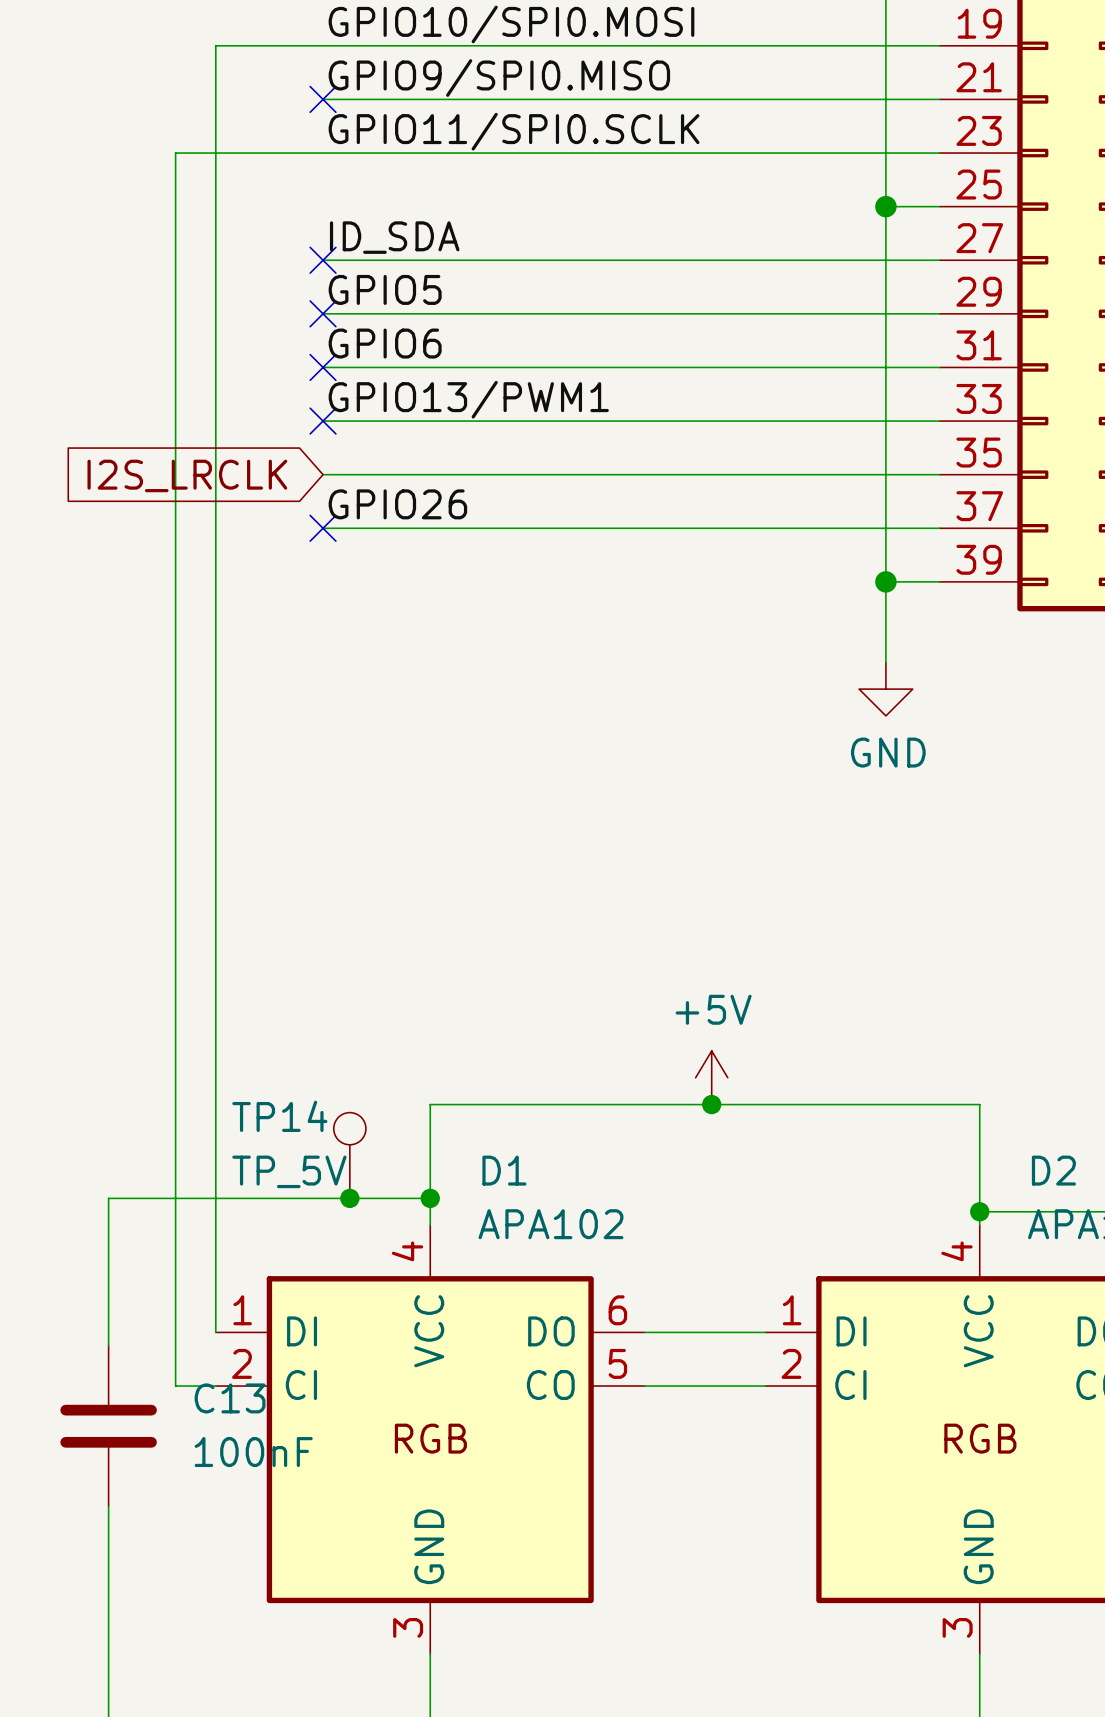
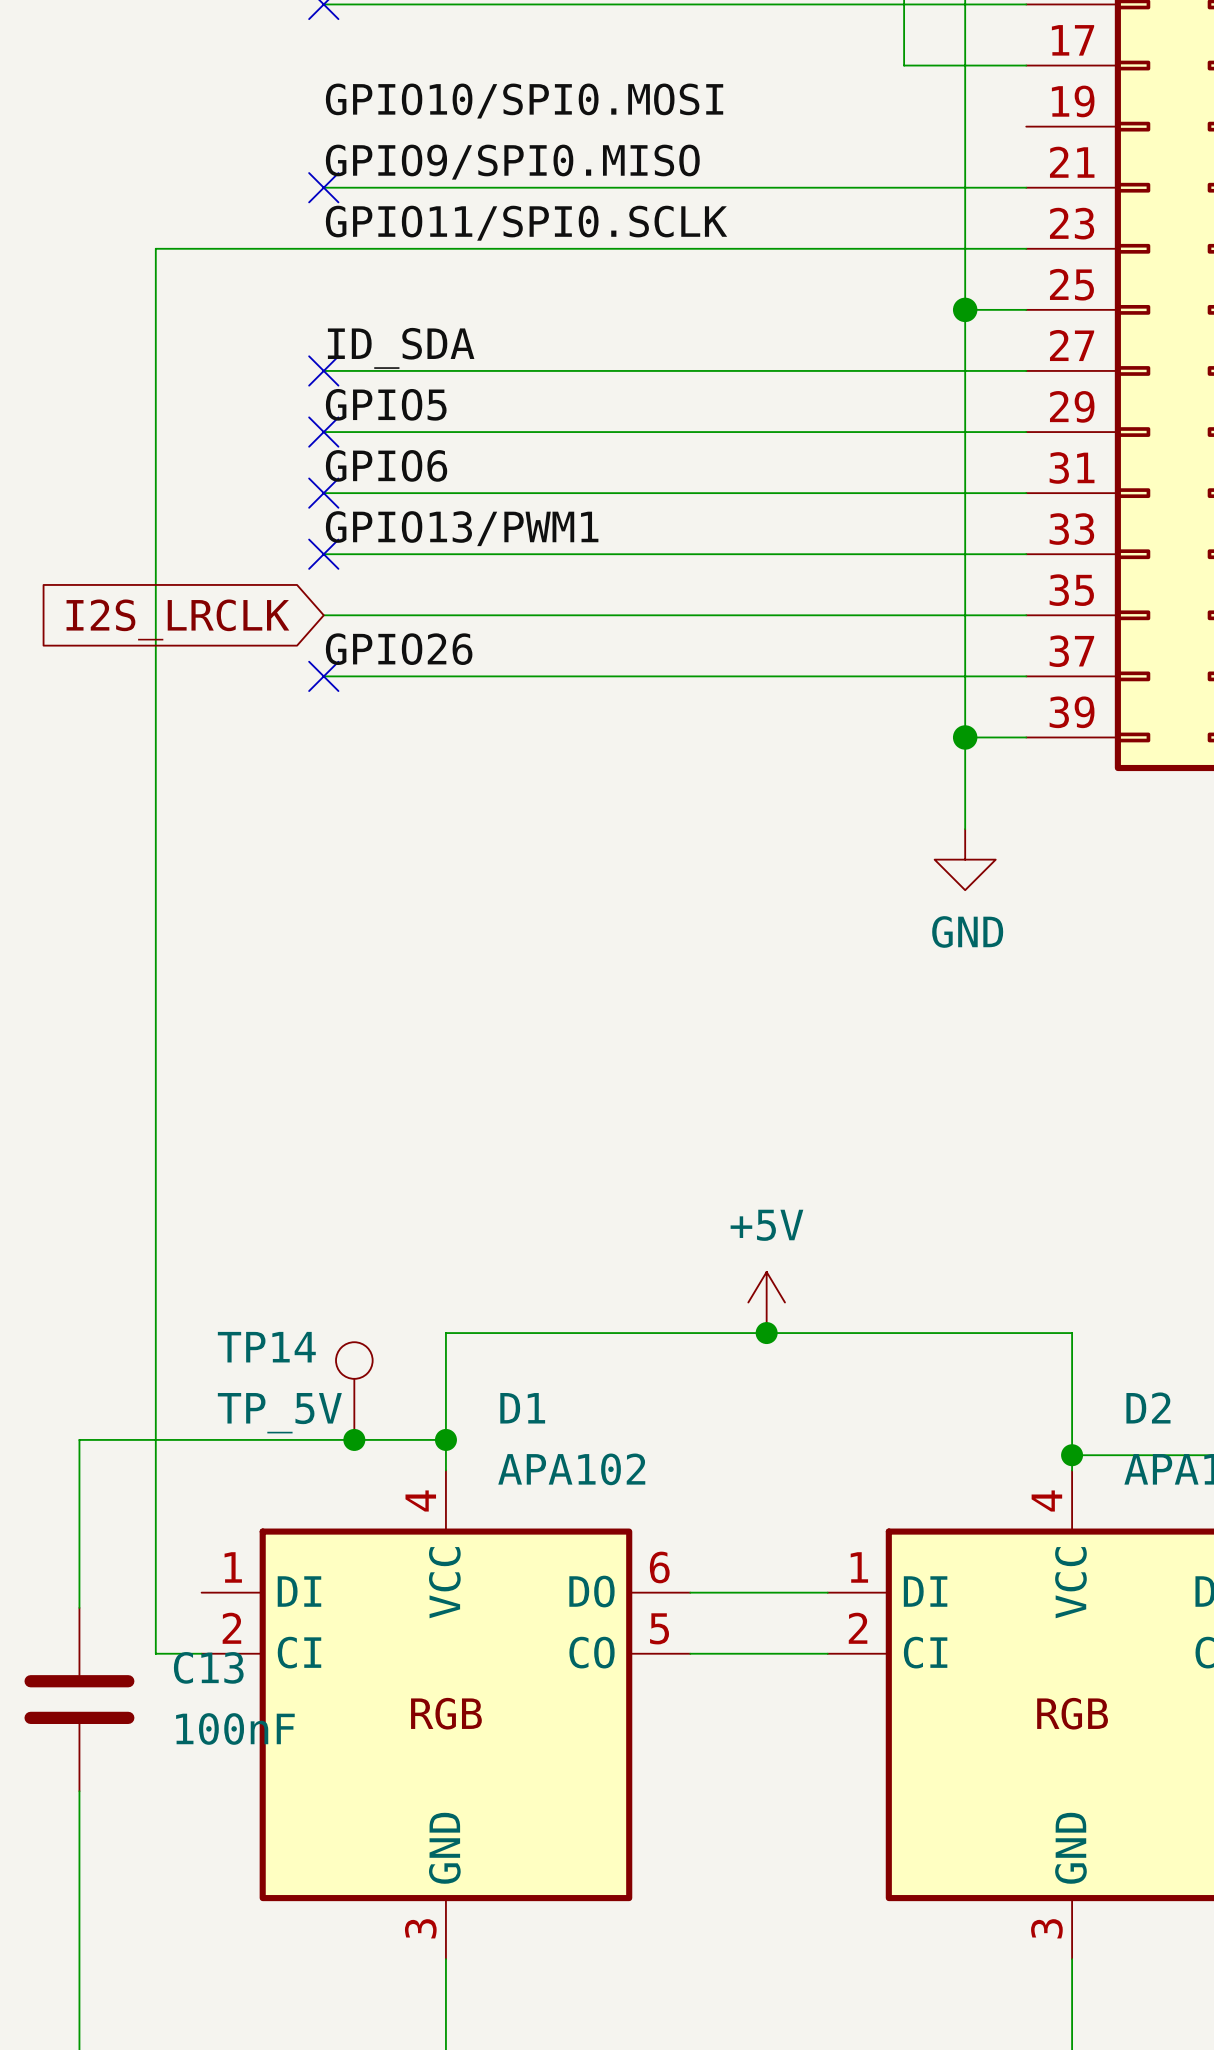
wire: (939, 45) (215, 45) (215, 1332) -> none

